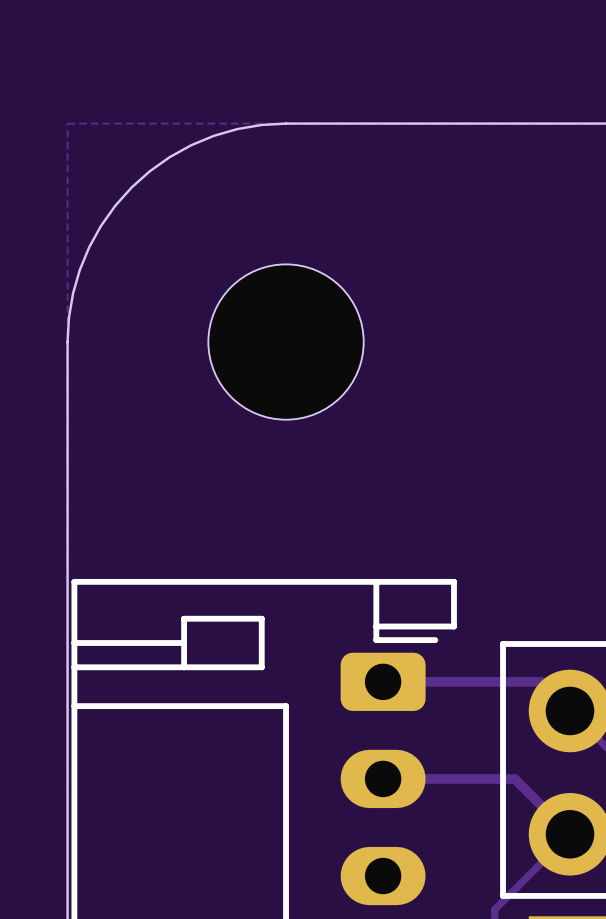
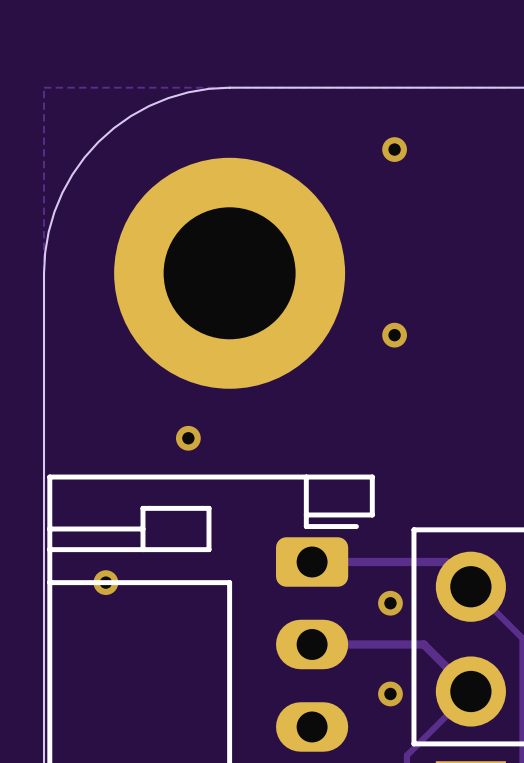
via: none -> (394, 149)
part footprint: [208, 264, 364, 420] -> [114, 157, 346, 389]
via: none -> (394, 335)
via: none -> (188, 438)
via: none -> (105, 582)
via: none -> (390, 603)
via: none -> (390, 693)

